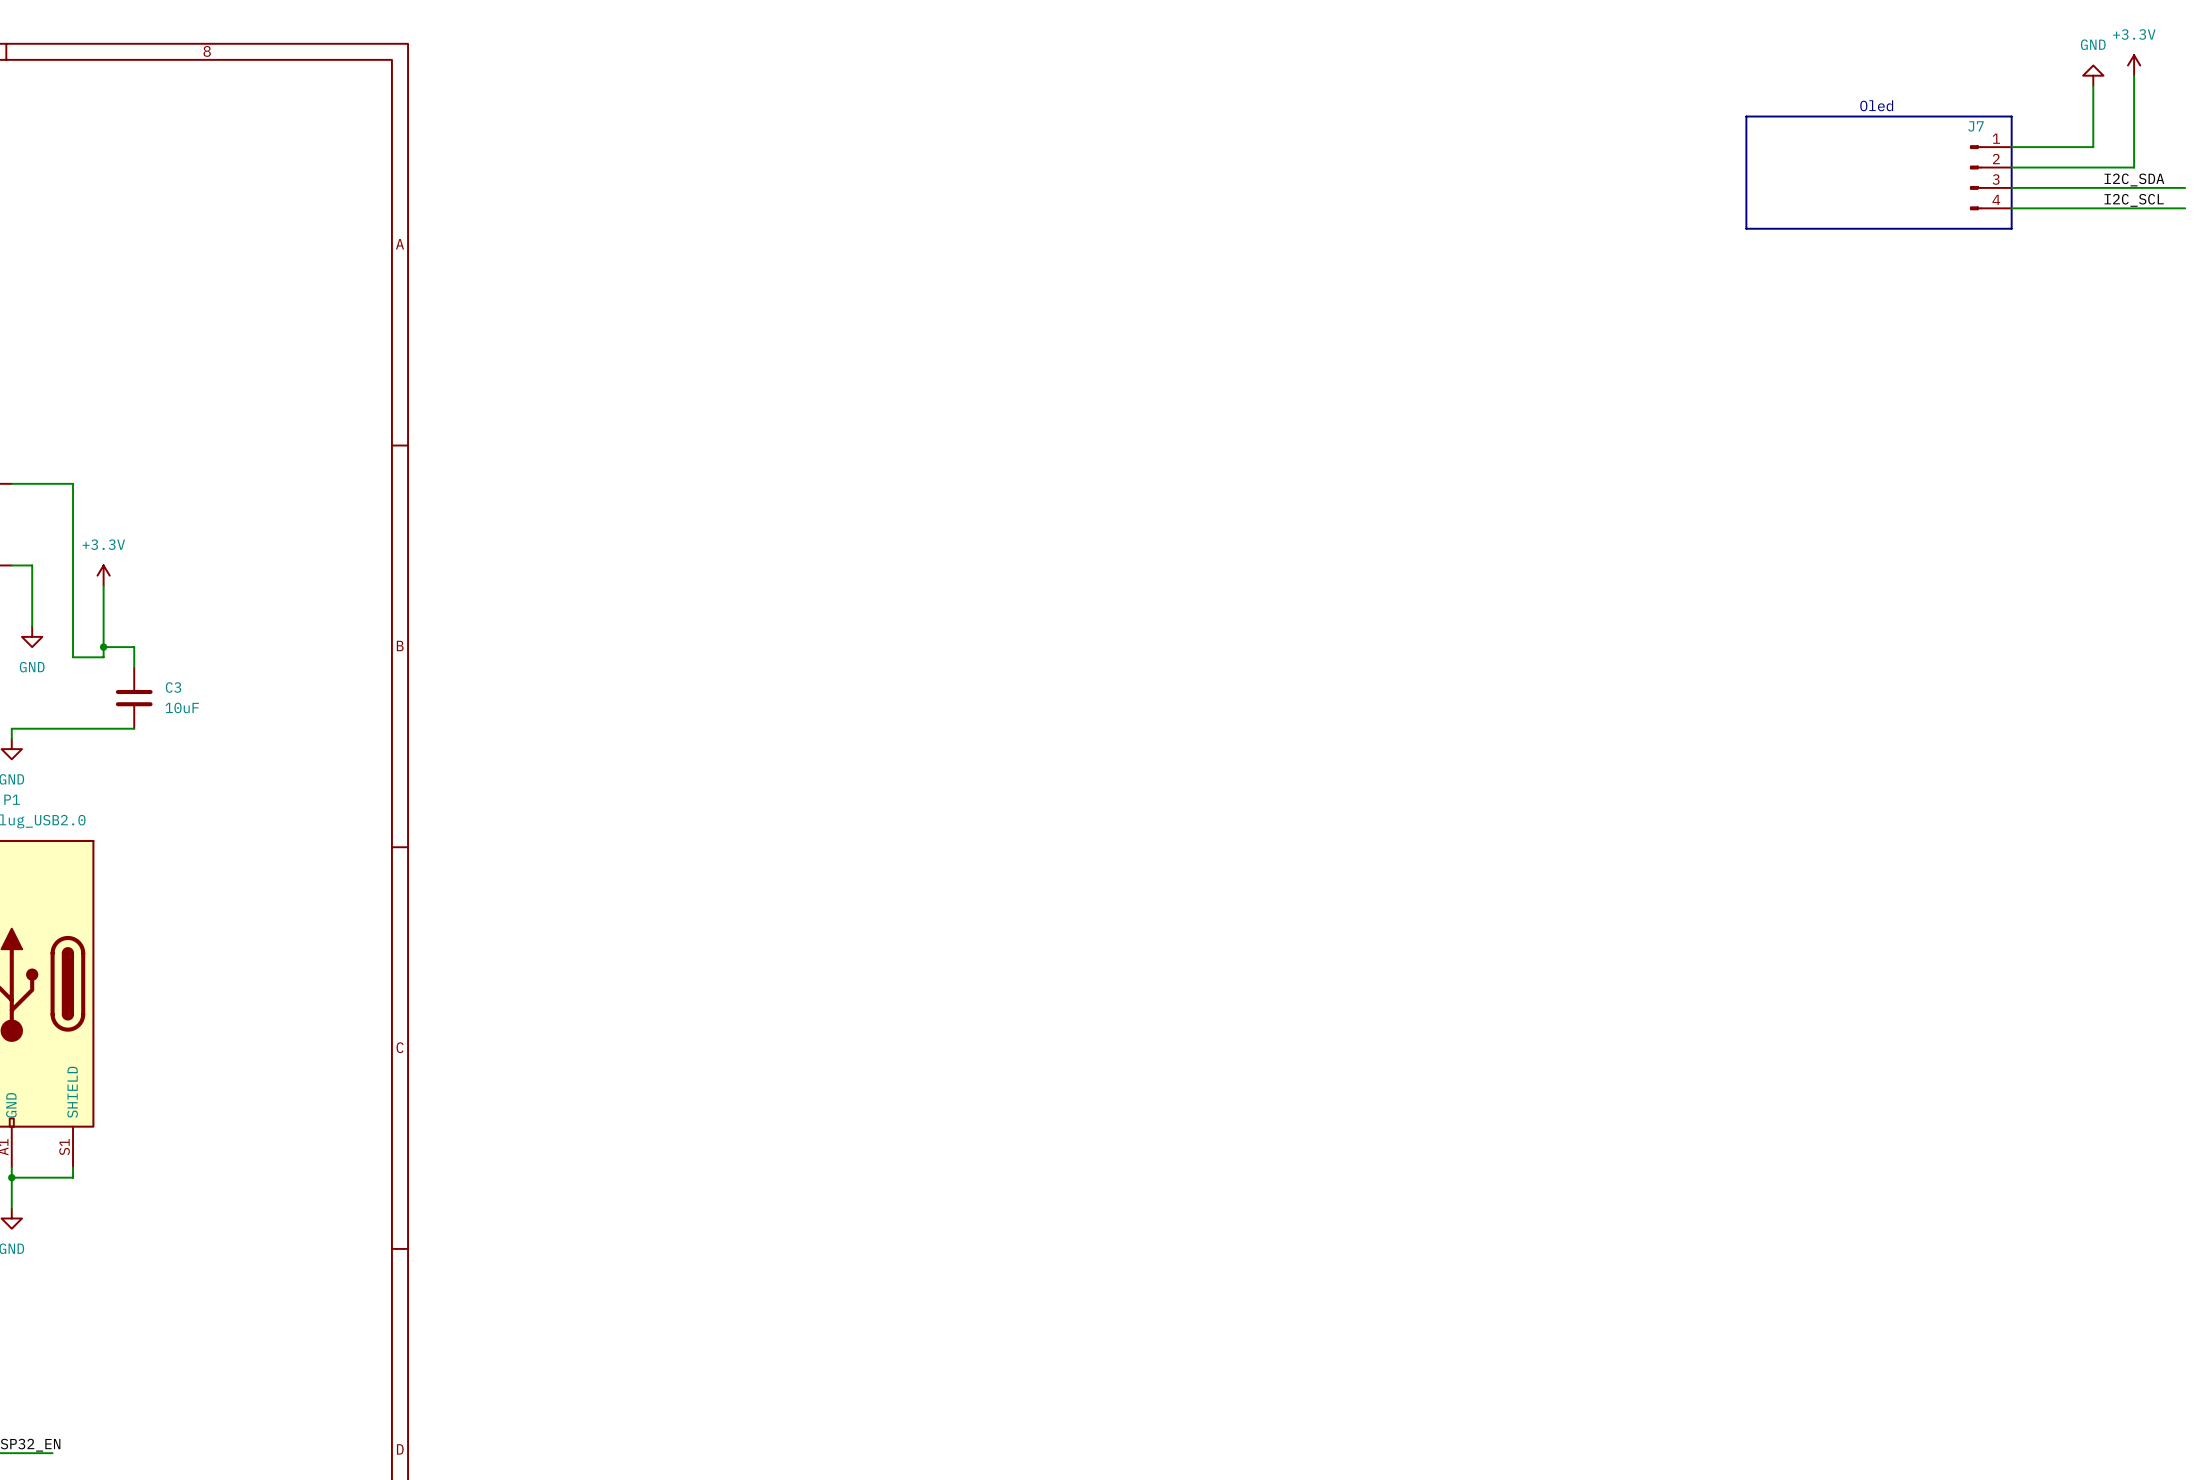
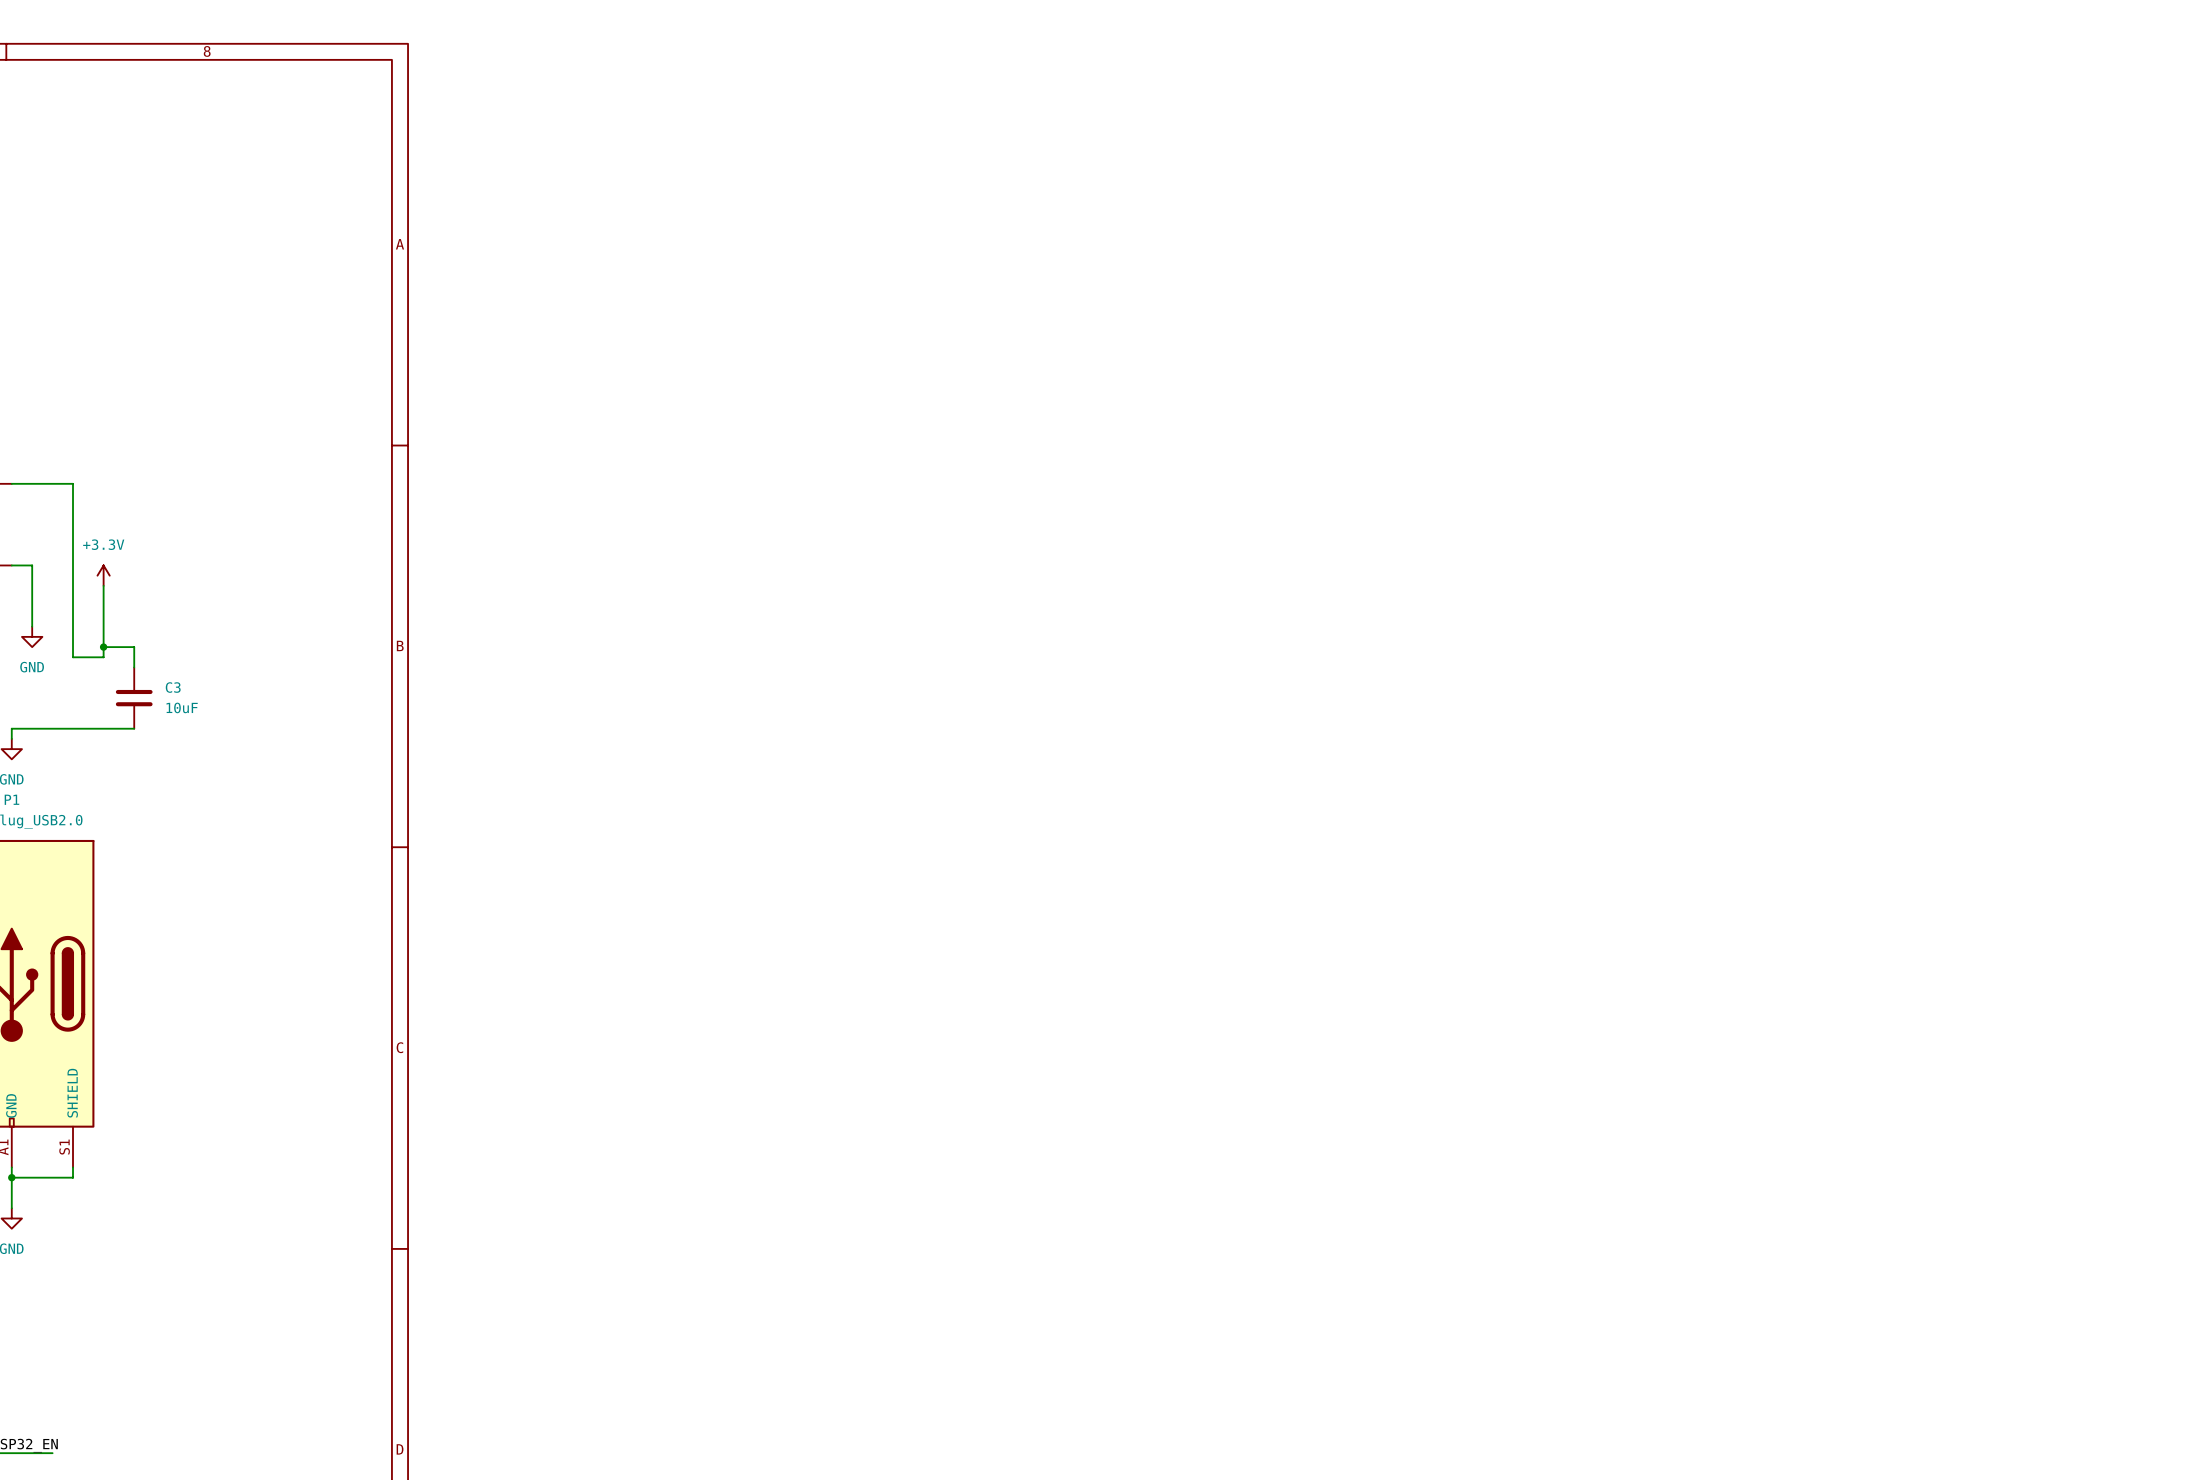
power symbol: +3.3V (2134, 65) -> none
power symbol: GND (2093, 75) -> none
wire: (2134, 75) (2134, 167) (2011, 167) -> none
wire: (2093, 85) (2093, 147) (2011, 147) -> none
text: Oled (1876, 105) -> none
line: (1746, 116) (2011, 116) (2011, 228) (1746, 228) (1746, 116) -> none
J7: (1990, 177) -> none
label: I2C_SDA (2134, 179) -> none
wire: (2011, 187) (2185, 187) -> none
label: I2C_SCL (2134, 200) -> none
wire: (2011, 208) (2185, 208) -> none

